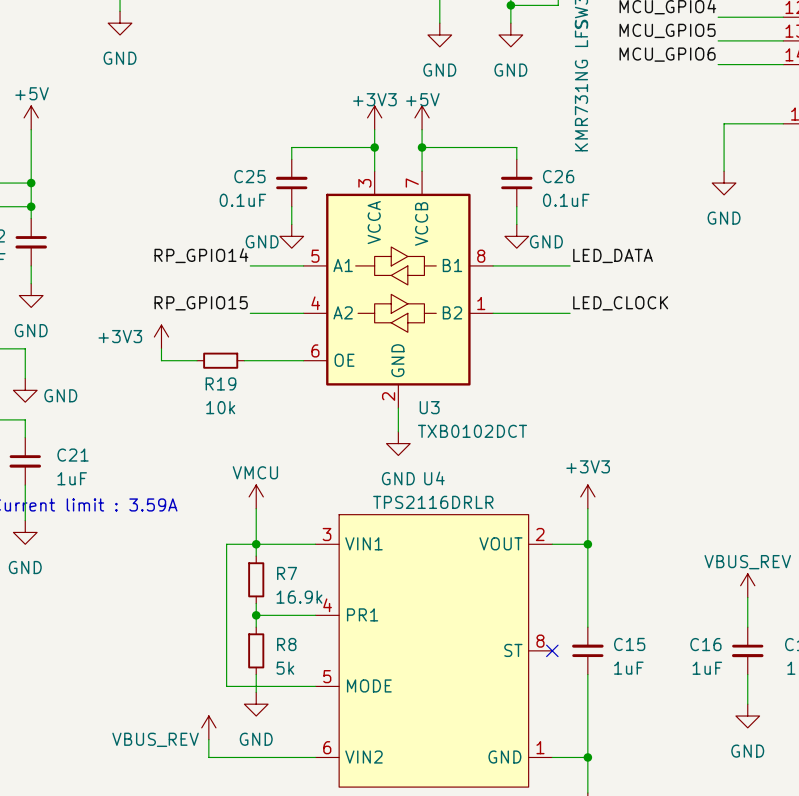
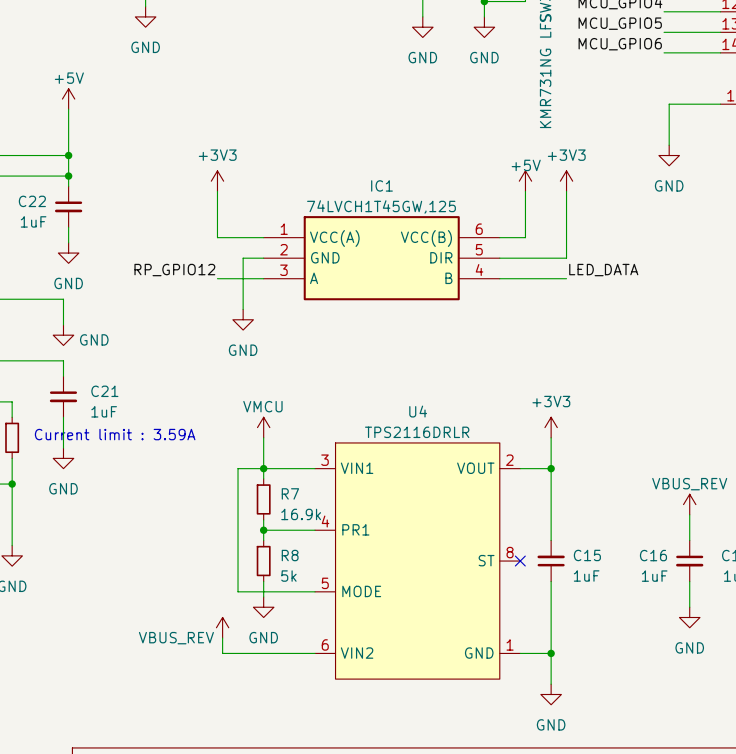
power symbol: +3V3 (374, 117) -> none
power symbol position: +5V (422, 117) -> +5V (525, 181)
wire: (374, 129) (374, 171) -> none
wire: (422, 129) (422, 171) -> none
wire: (374, 147) (291, 147) (291, 159) -> none
junction: (374, 147) -> none
wire: (422, 147) (516, 147) (516, 159) -> none
junction: (422, 147) -> none
C25: 0.1uF (291, 183) -> none
C26: 0.1uF (516, 183) -> none
wire: (291, 206) (291, 224) -> none
wire: (516, 206) (516, 224) -> none
power symbol: none -> +3V3 (217, 181)
power symbol: none -> +3V3 (566, 181)
wire: none -> (217, 191) (217, 237) (263, 237)
wire: none -> (525, 191) (525, 237) (499, 237)
wire: none -> (566, 191) (566, 258) (499, 258)
power symbol: GND (291, 236) -> none
power symbol: GND (516, 236) -> none
label: RP_GPIO14 (201, 255) -> none
label position: LED_DATA (613, 255) -> LED_DATA (603, 270)
wire: (250, 265) (303, 265) -> none
wire: (493, 265) (570, 265) -> none
U3: TXB0102DCT (398, 289) -> none
wire: none -> (263, 258) (243, 258) (243, 309)
IC1: none -> 74LVCH1T45GW,125 (381, 258)
label: RP_GPIO15 (201, 303) -> RP_GPIO12 (174, 270)
label: LED_CLOCK (620, 303) -> none
wire: (250, 313) (303, 313) -> (217, 278) (263, 278)
wire: (493, 313) (570, 313) -> (499, 278) (566, 278)
power symbol: +3V3 (161, 337) -> none
wire: (161, 348) (161, 360) (197, 360) -> none
R19: 10k (220, 360) -> none
wire: (244, 360) (303, 360) -> none
power symbol: none -> GND (243, 319)
wire: (398, 408) (398, 431) -> none
power symbol: GND (398, 443) -> none

